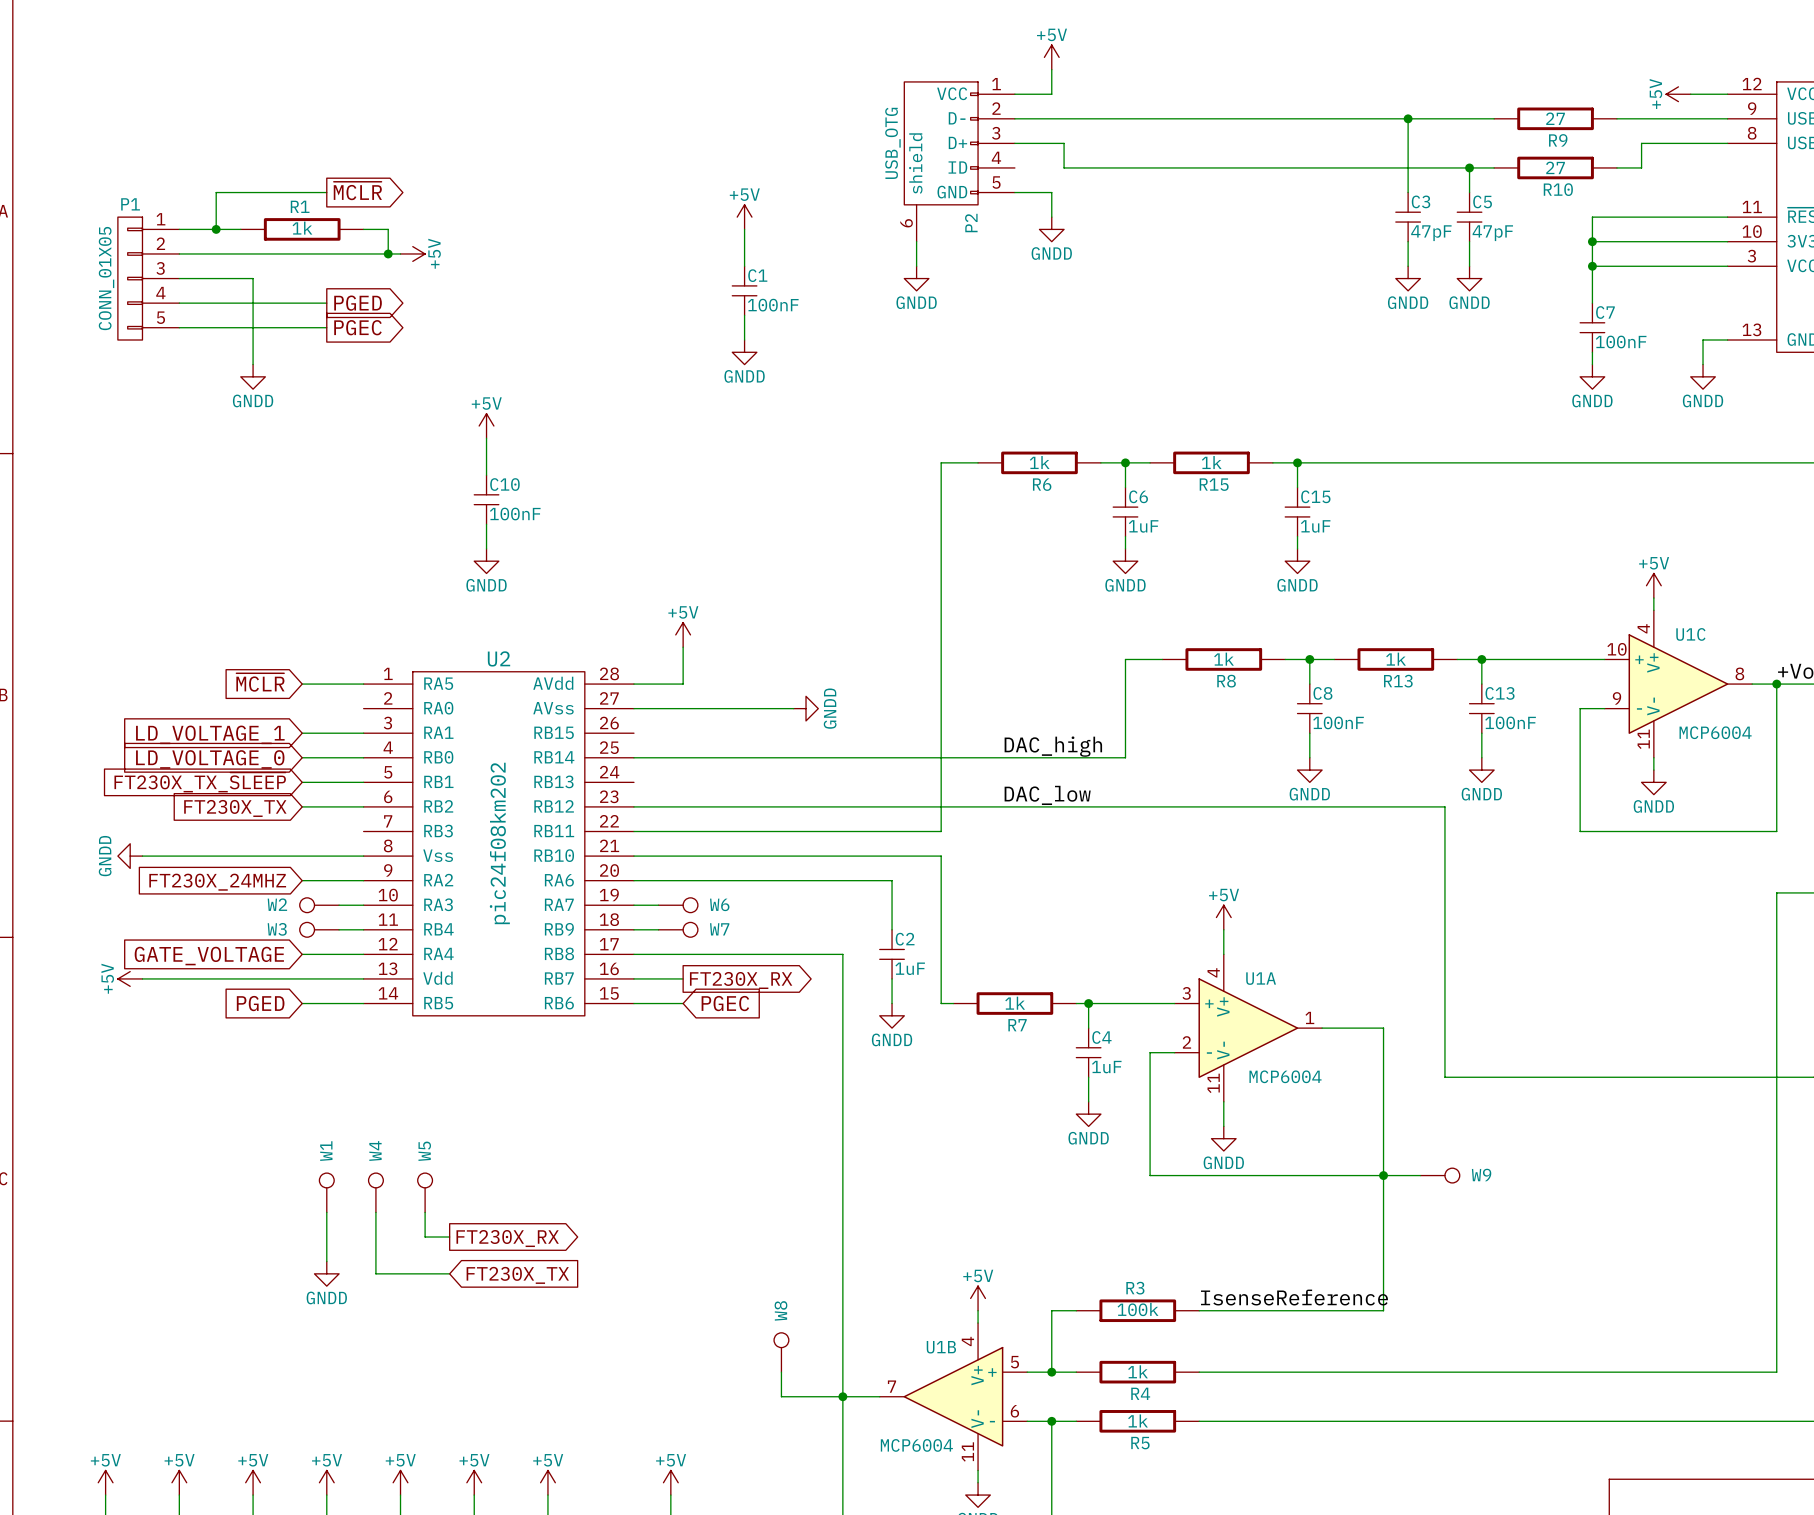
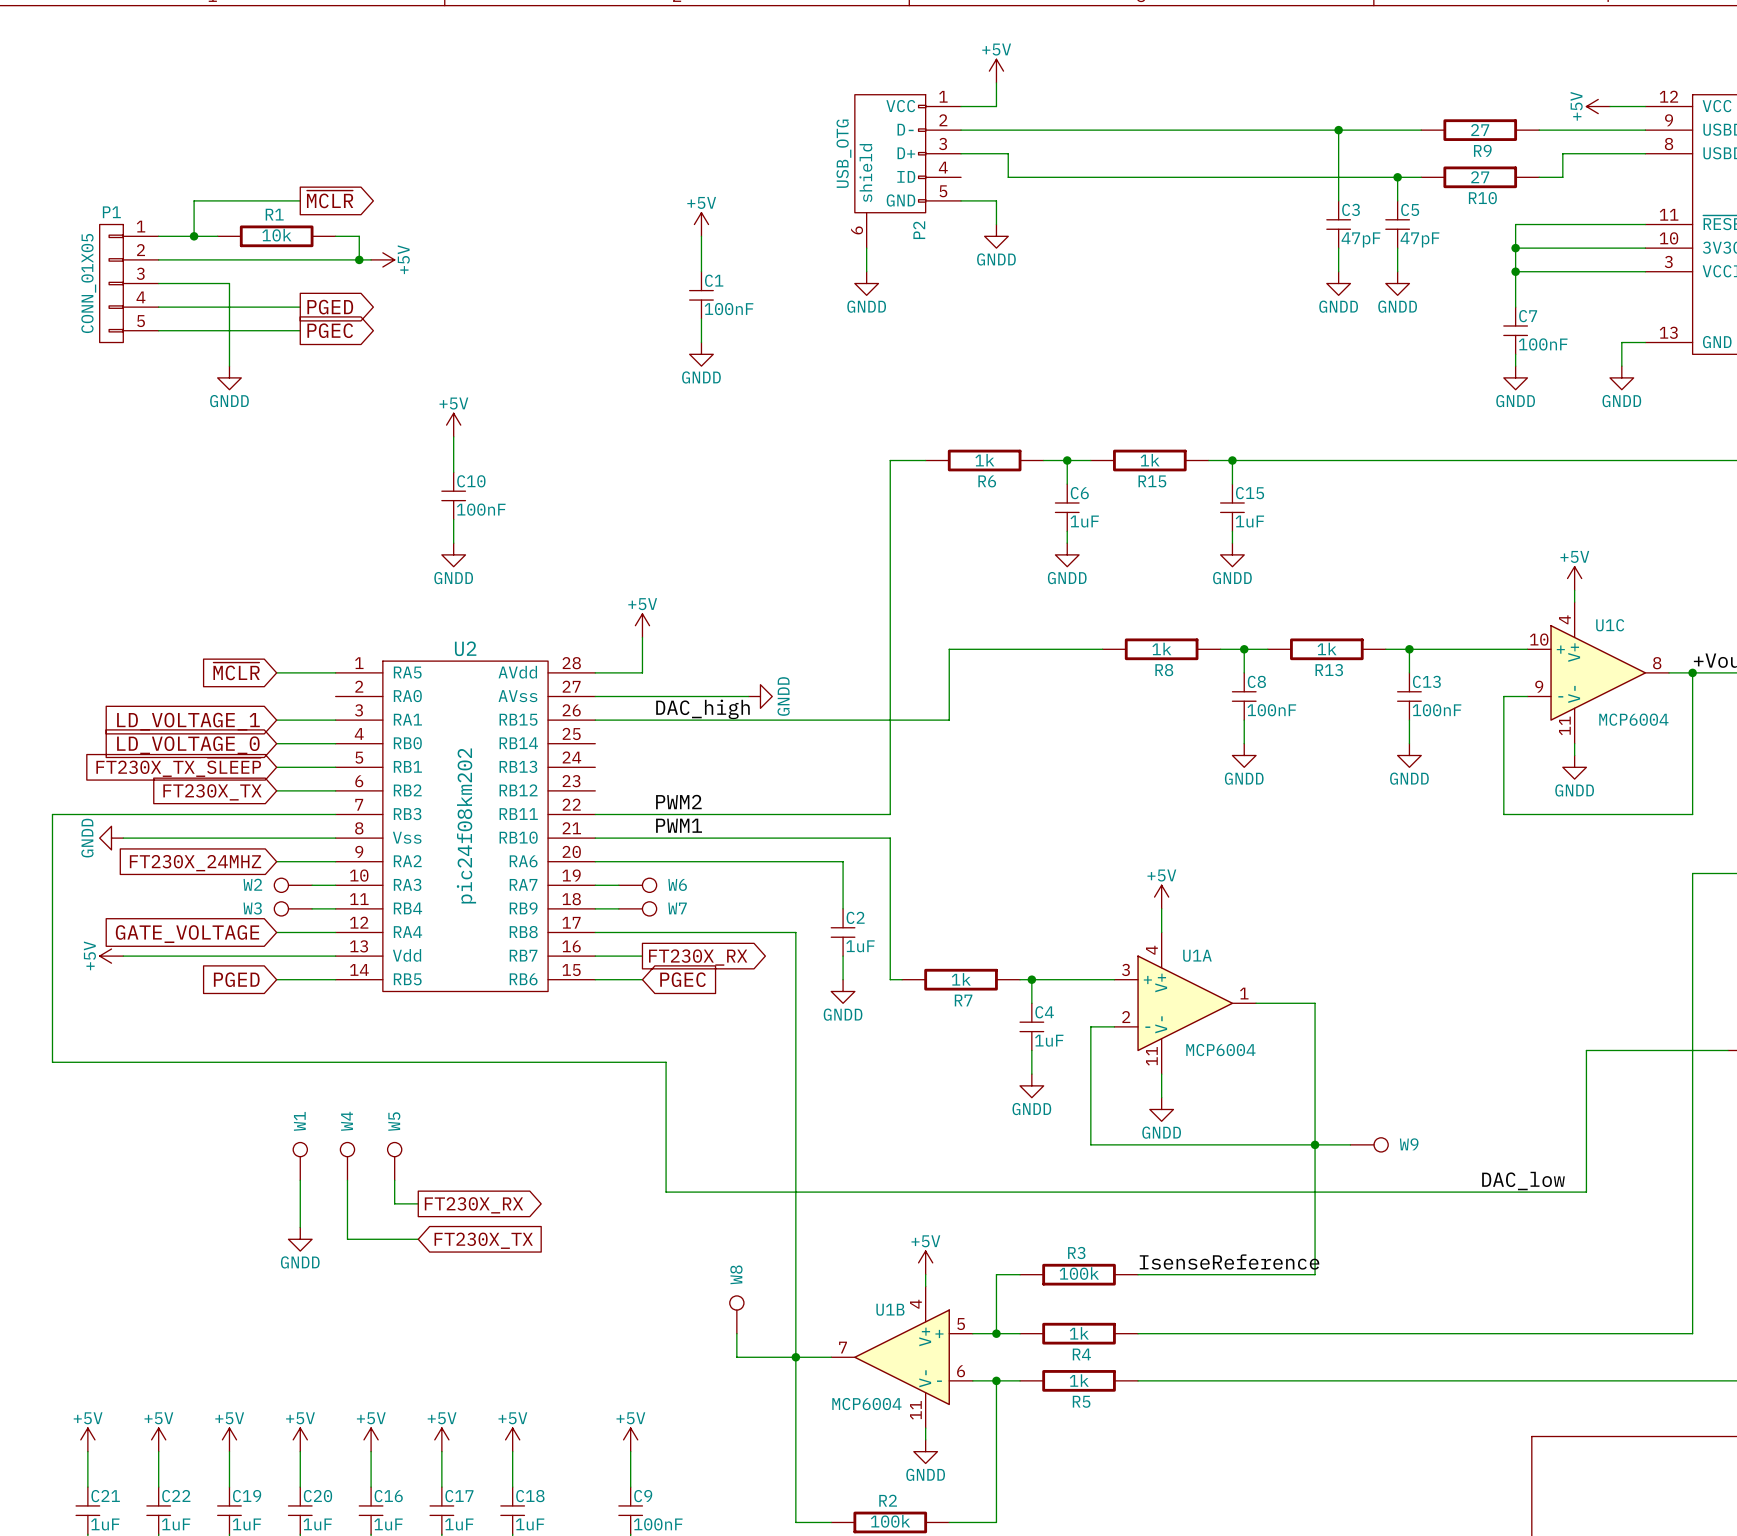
R1 value: 1k (302, 228) -> 10k (276, 235)
wire: (1125, 659) (1125, 757) (633, 757) -> (1067, 649) (949, 649) (949, 720) (595, 720)
label: none -> DAC_high (702, 709)
label: DAC_high (1053, 746) -> none
label: DAC_low (1047, 795) -> none
wire: (633, 806) (1444, 806) (1444, 1077) (1666, 1077) -> (335, 814) (52, 814) (52, 1062) (666, 1062) (666, 1192) (1586, 1192) (1586, 1050)
label: none -> PWM2 (678, 802)
label: none -> PWM1 (679, 825)
label: none -> DAC_low (1523, 1181)

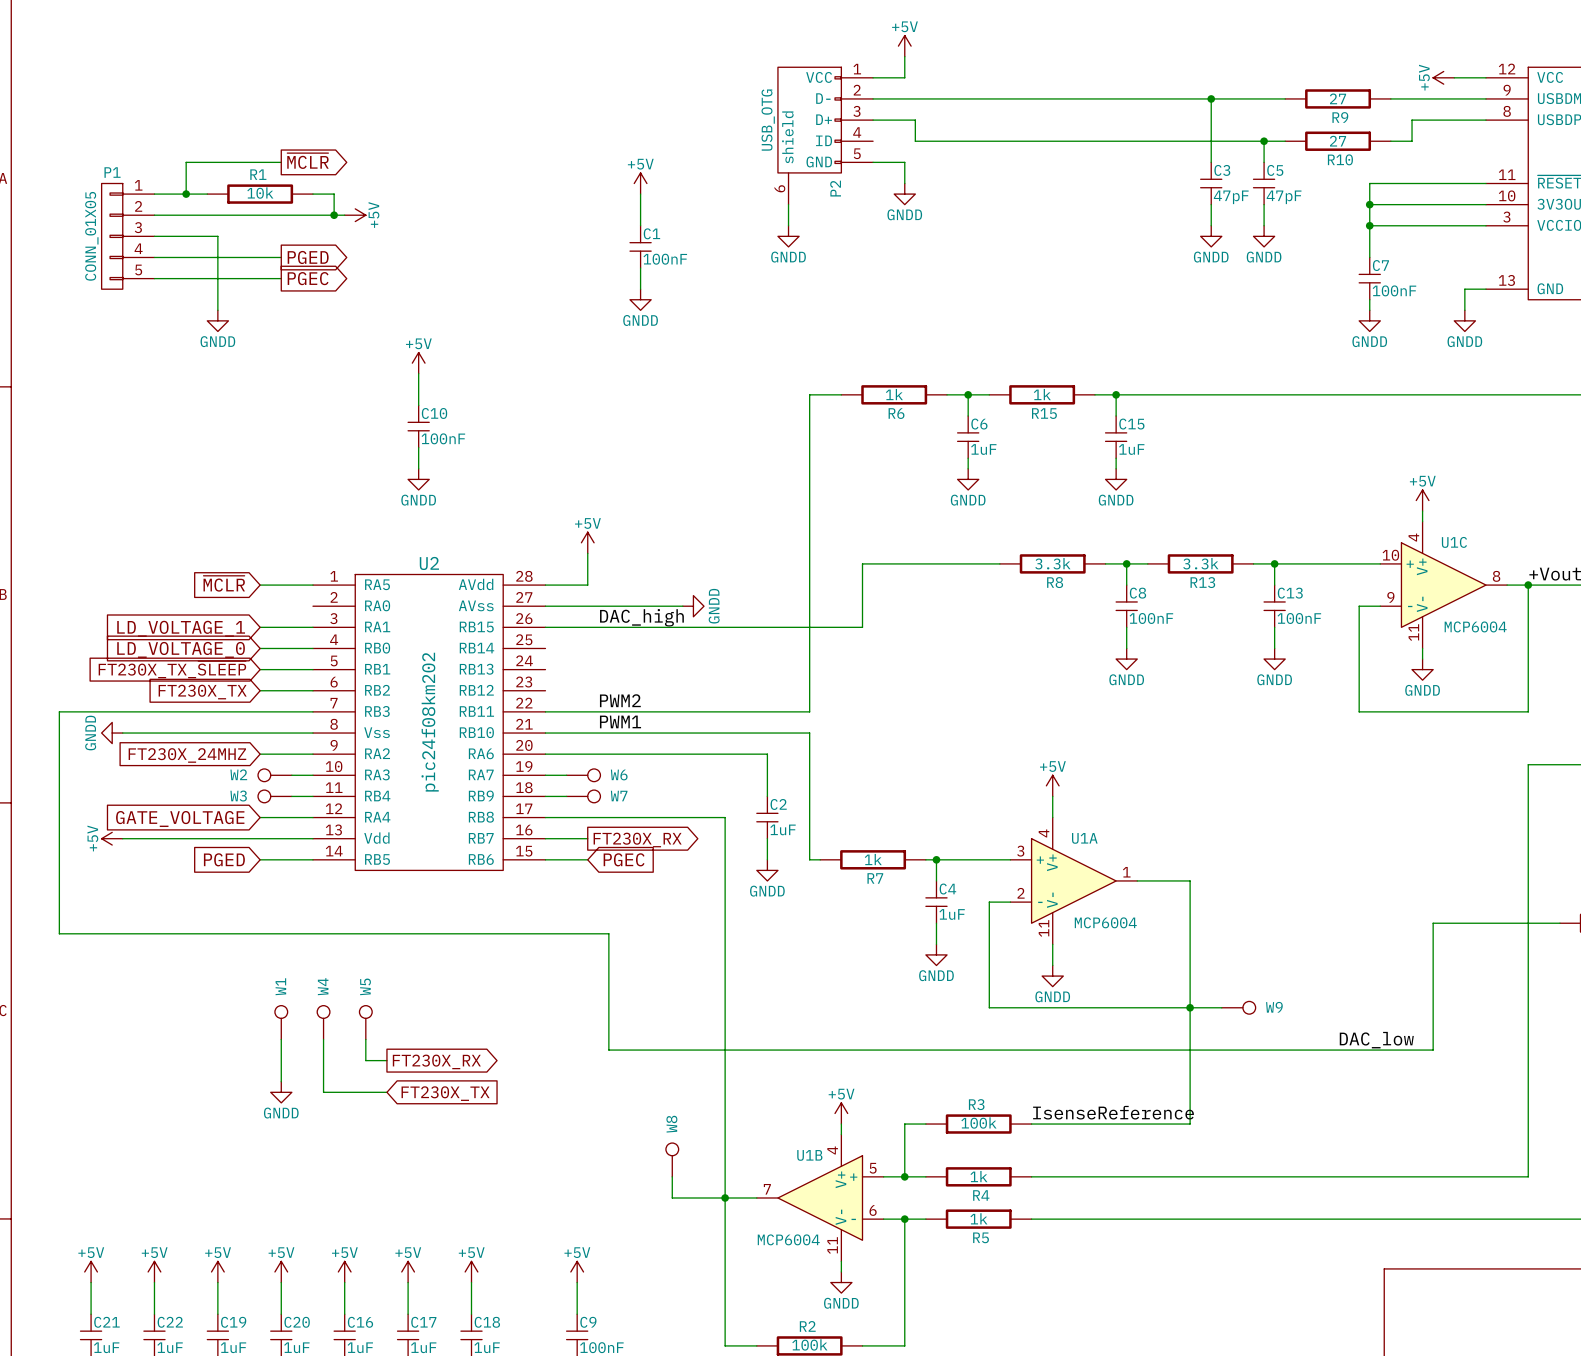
R8 value: 1k (1161, 648) -> 3.3k (1052, 563)
R13 value: 1k (1327, 648) -> 3.3k (1200, 563)

